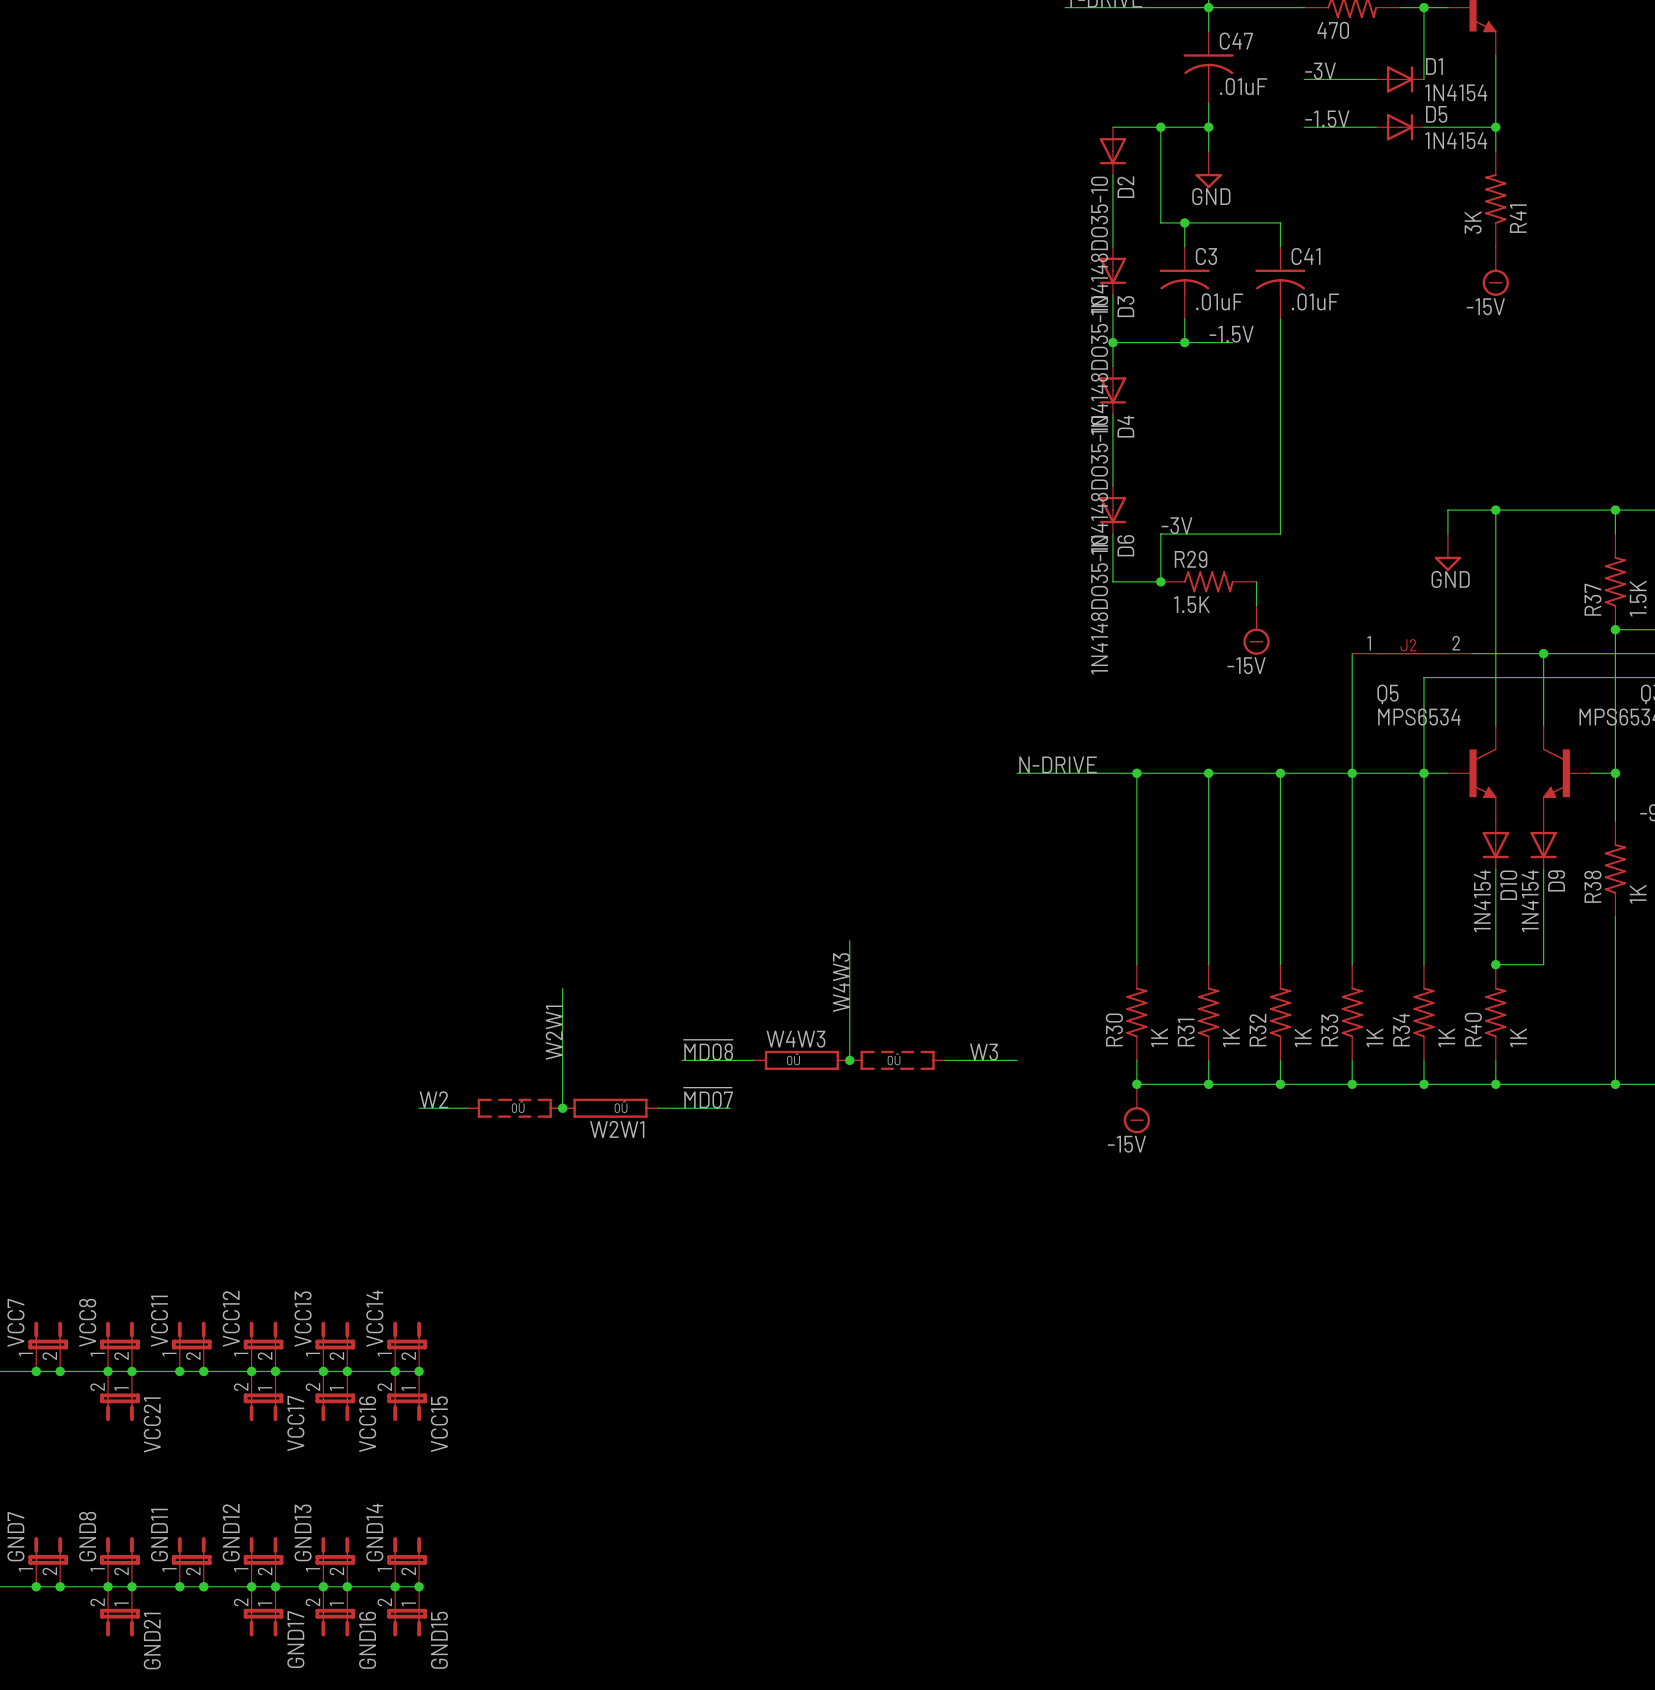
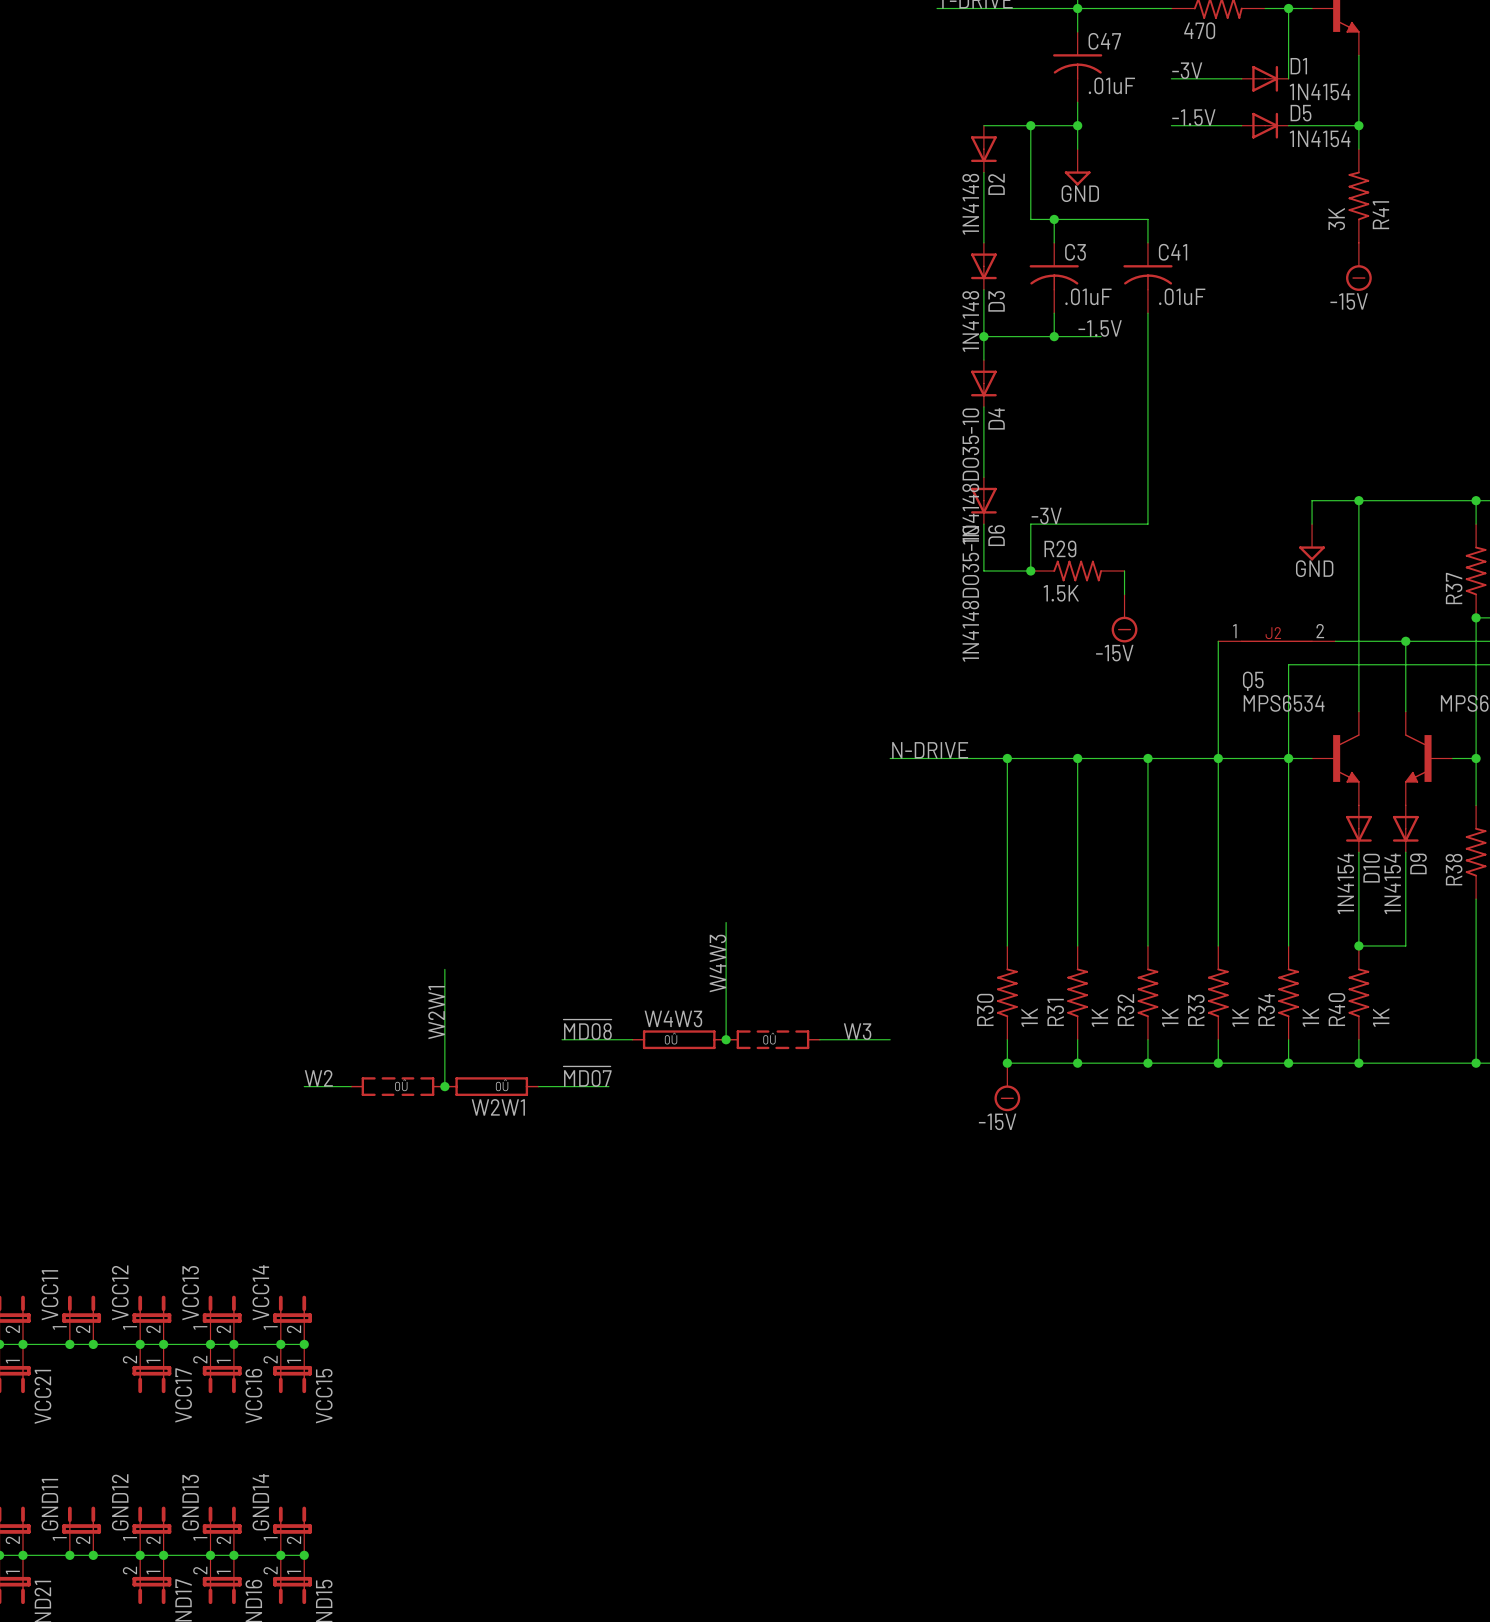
D2 value: 1N4148DO35-10 (1099, 246) -> 1N4148 (970, 204)
D3 value: 1N4148DO35-10 (1099, 365) -> 1N4148 (970, 321)

